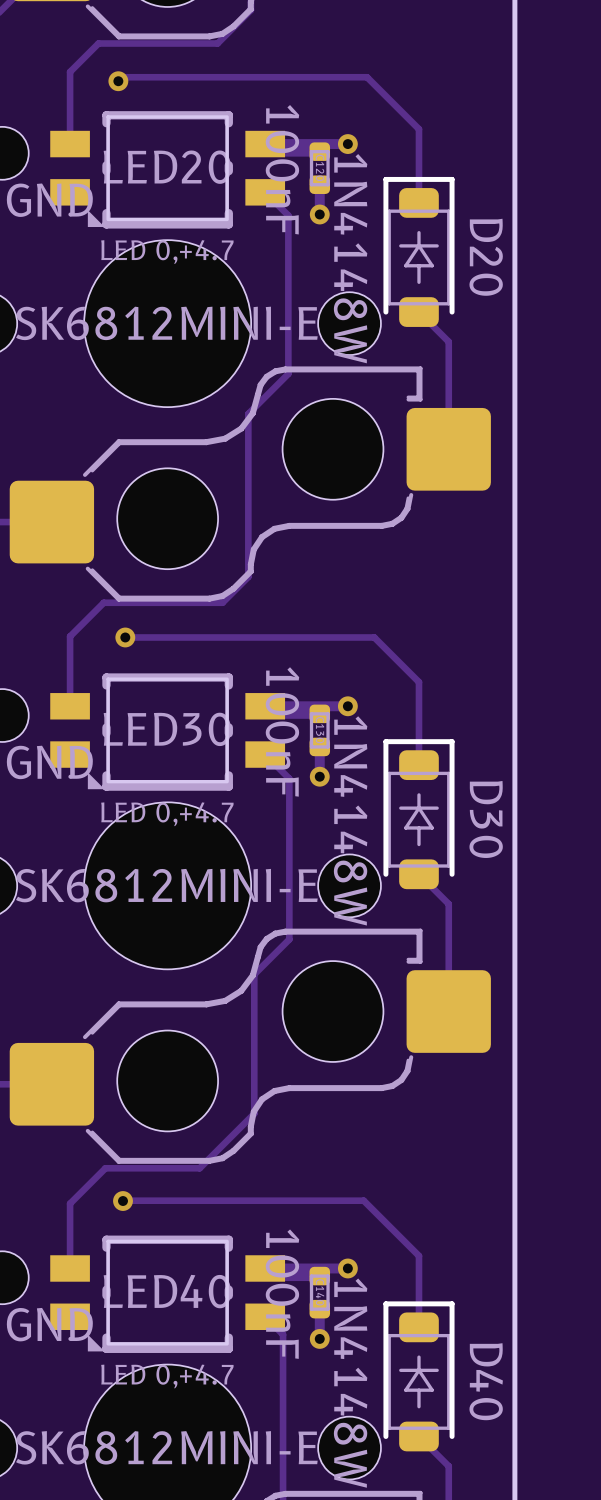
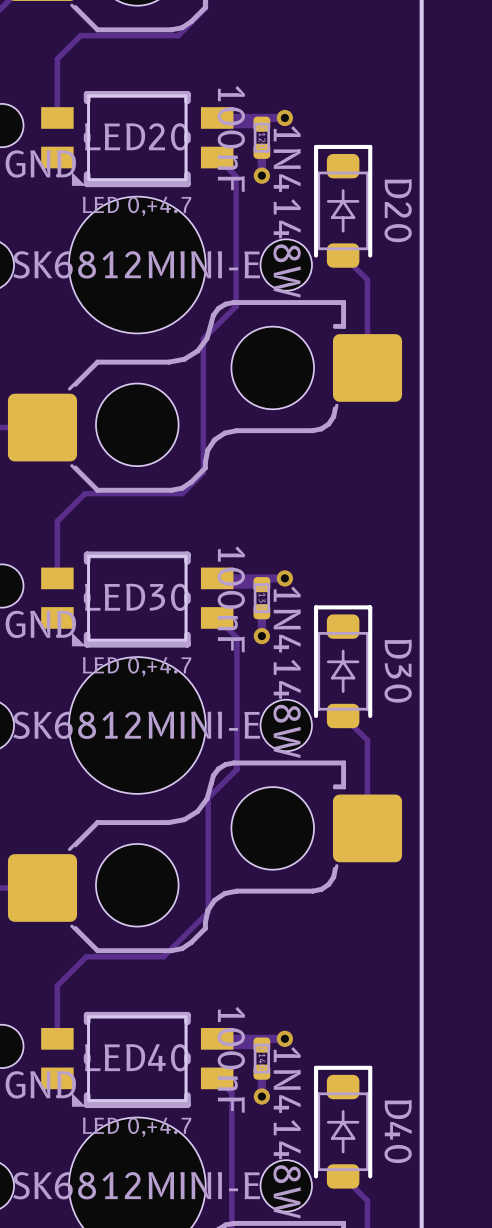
track: (118, 81) (122, 77) (367, 77) (418, 129) (418, 202) -> none
via: (118, 81) -> none
track: (125, 637) (374, 637) (418, 682) (418, 765) -> none
via: (125, 637) -> none
track: (123, 1200) (363, 1200) (418, 1255) (418, 1327) -> none
via: (122, 1201) -> none

